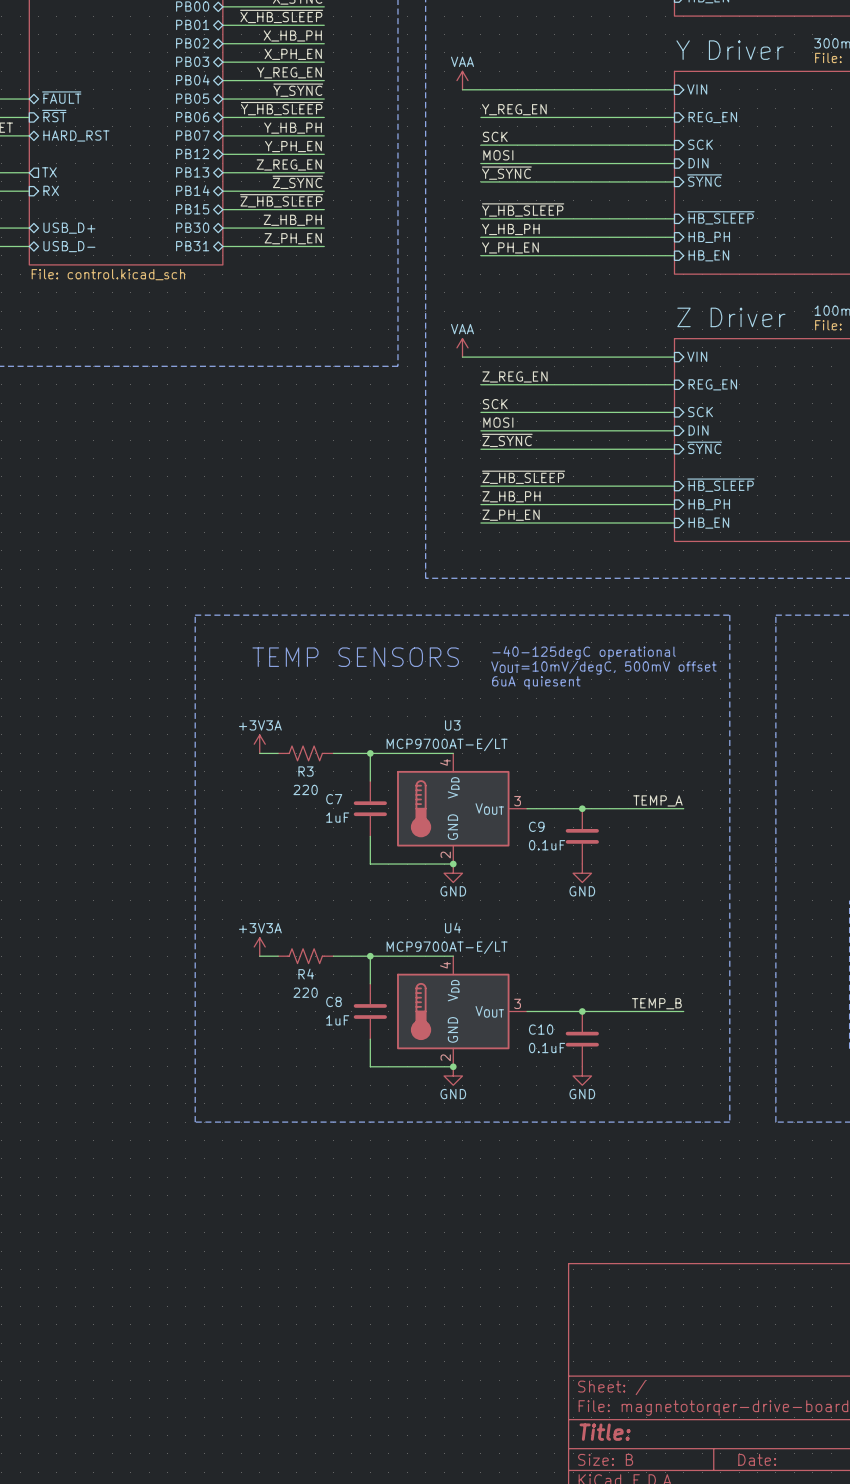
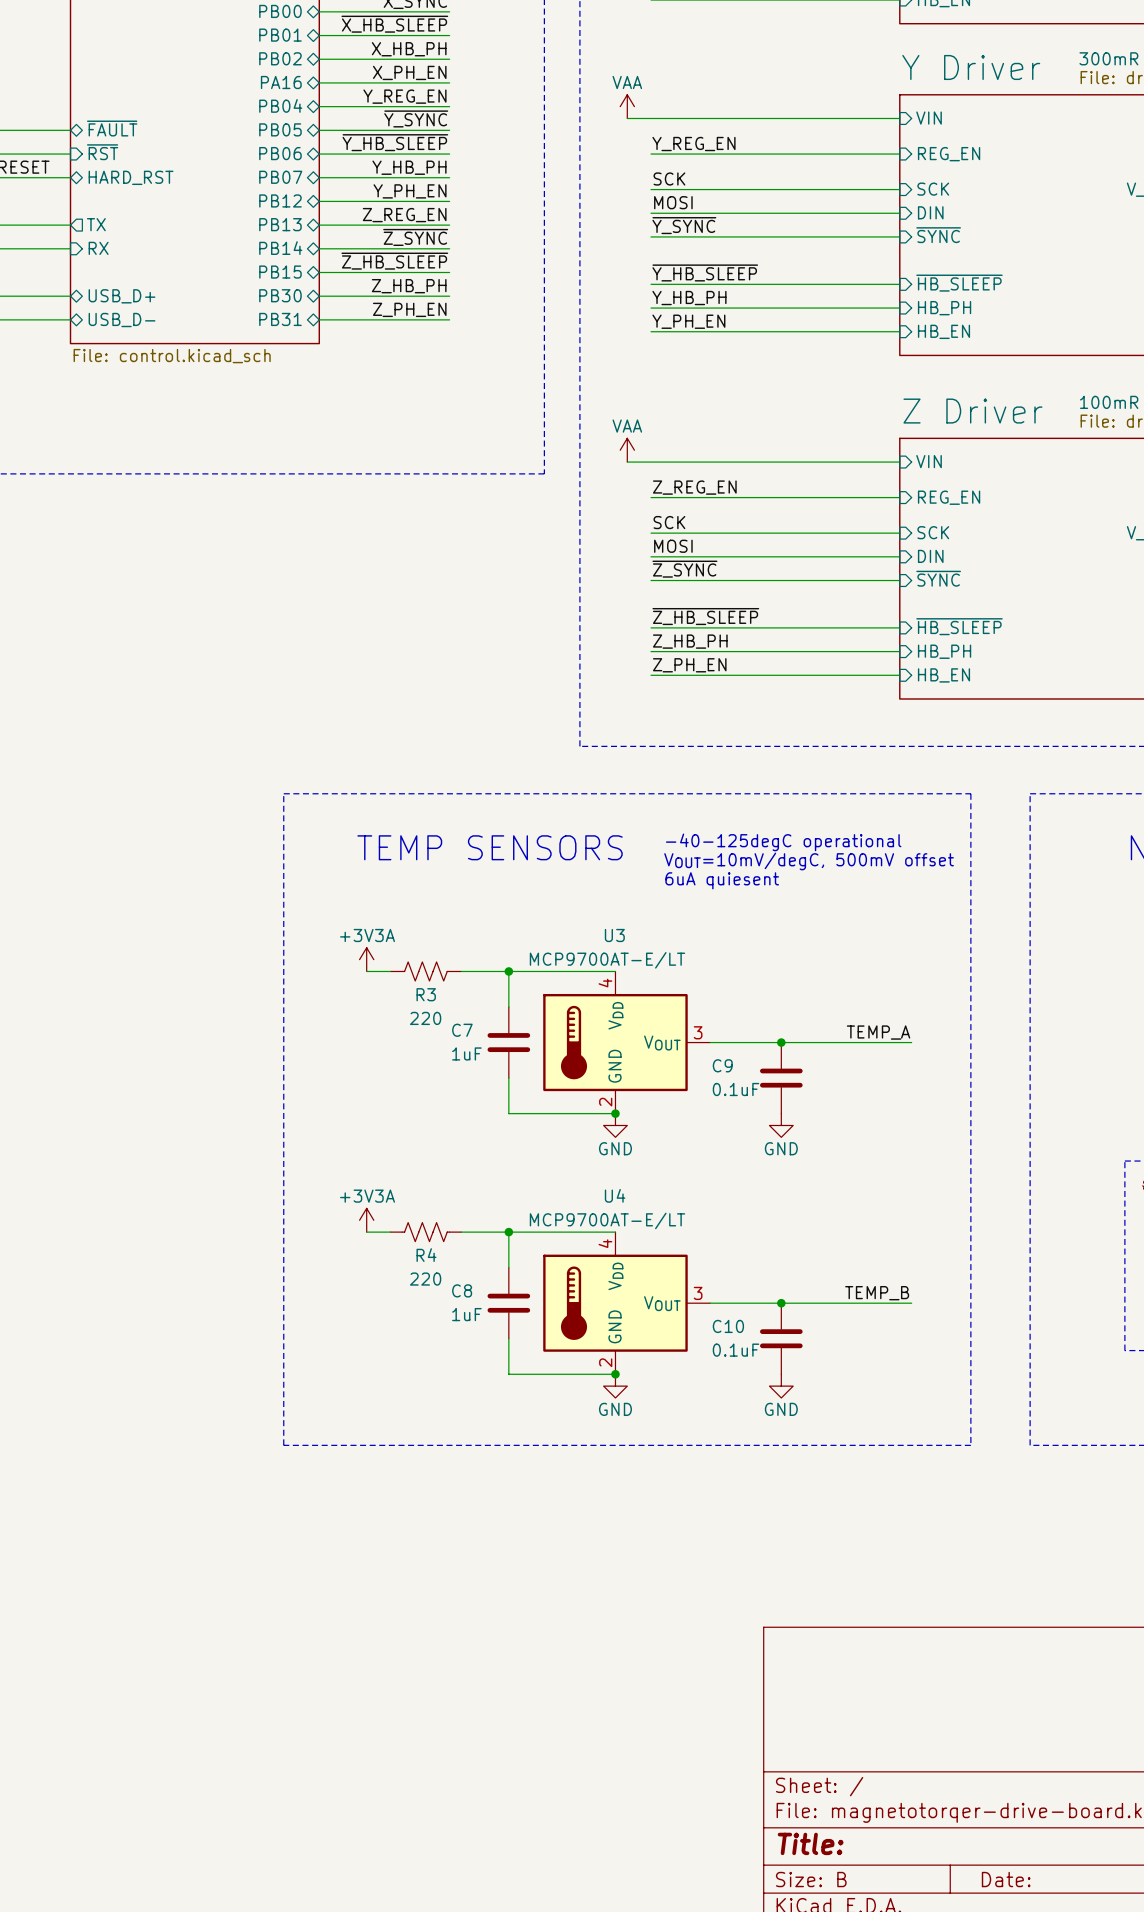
sheet pin: PB03 (192, 61) -> PA16 (281, 82)

